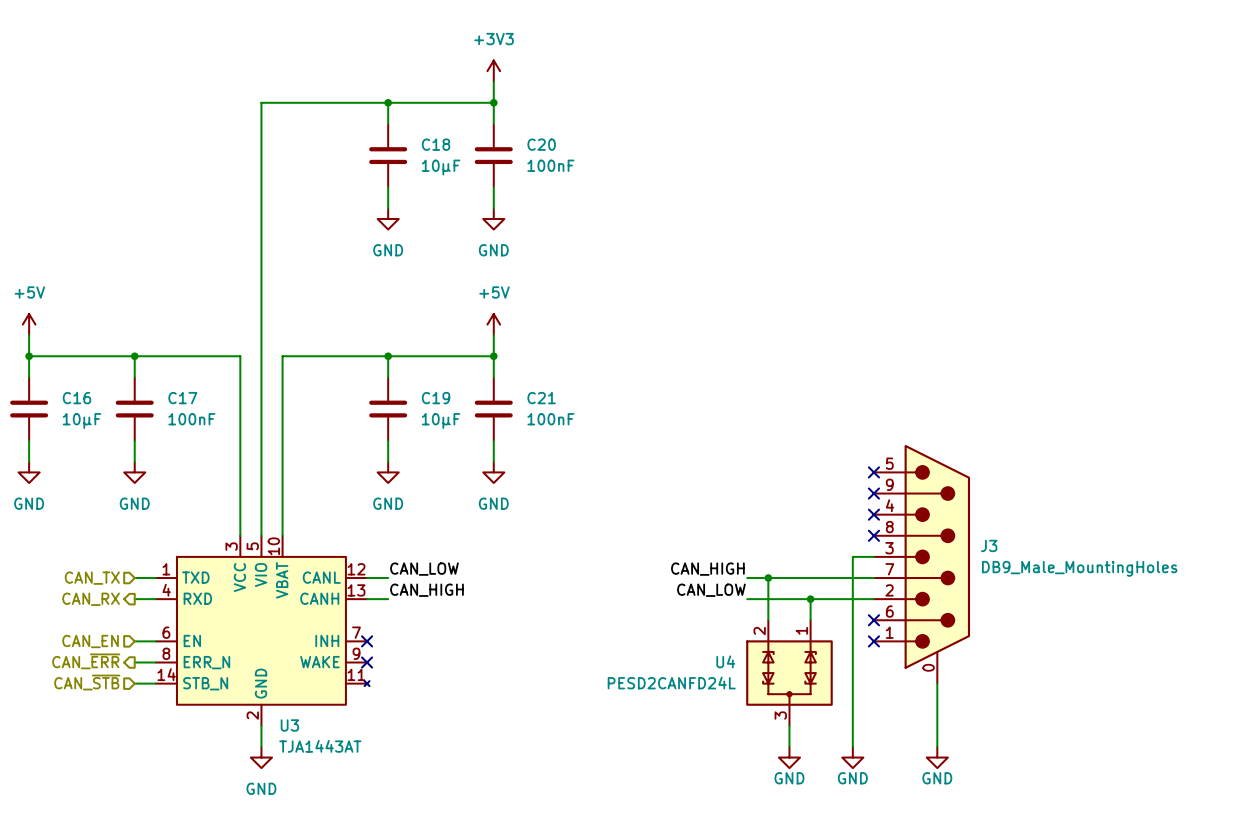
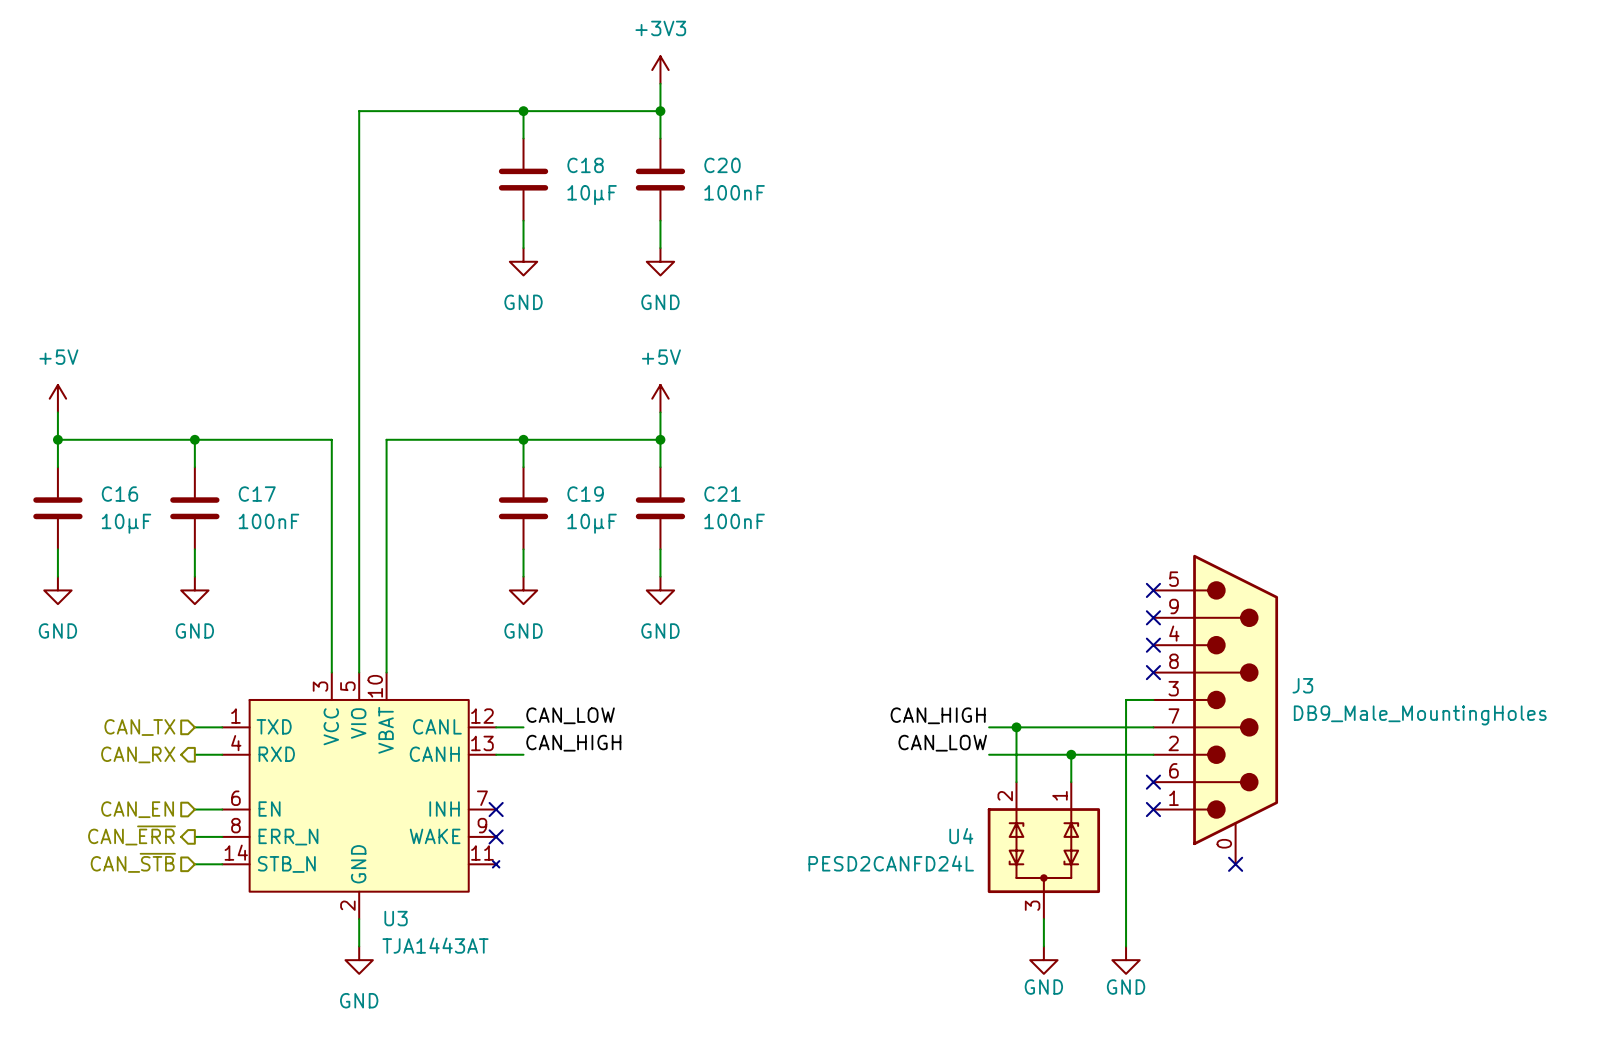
wire: (937, 683) (937, 746) -> none
no-connect mark: none -> (1235, 864)
power symbol: GND (937, 757) -> none

